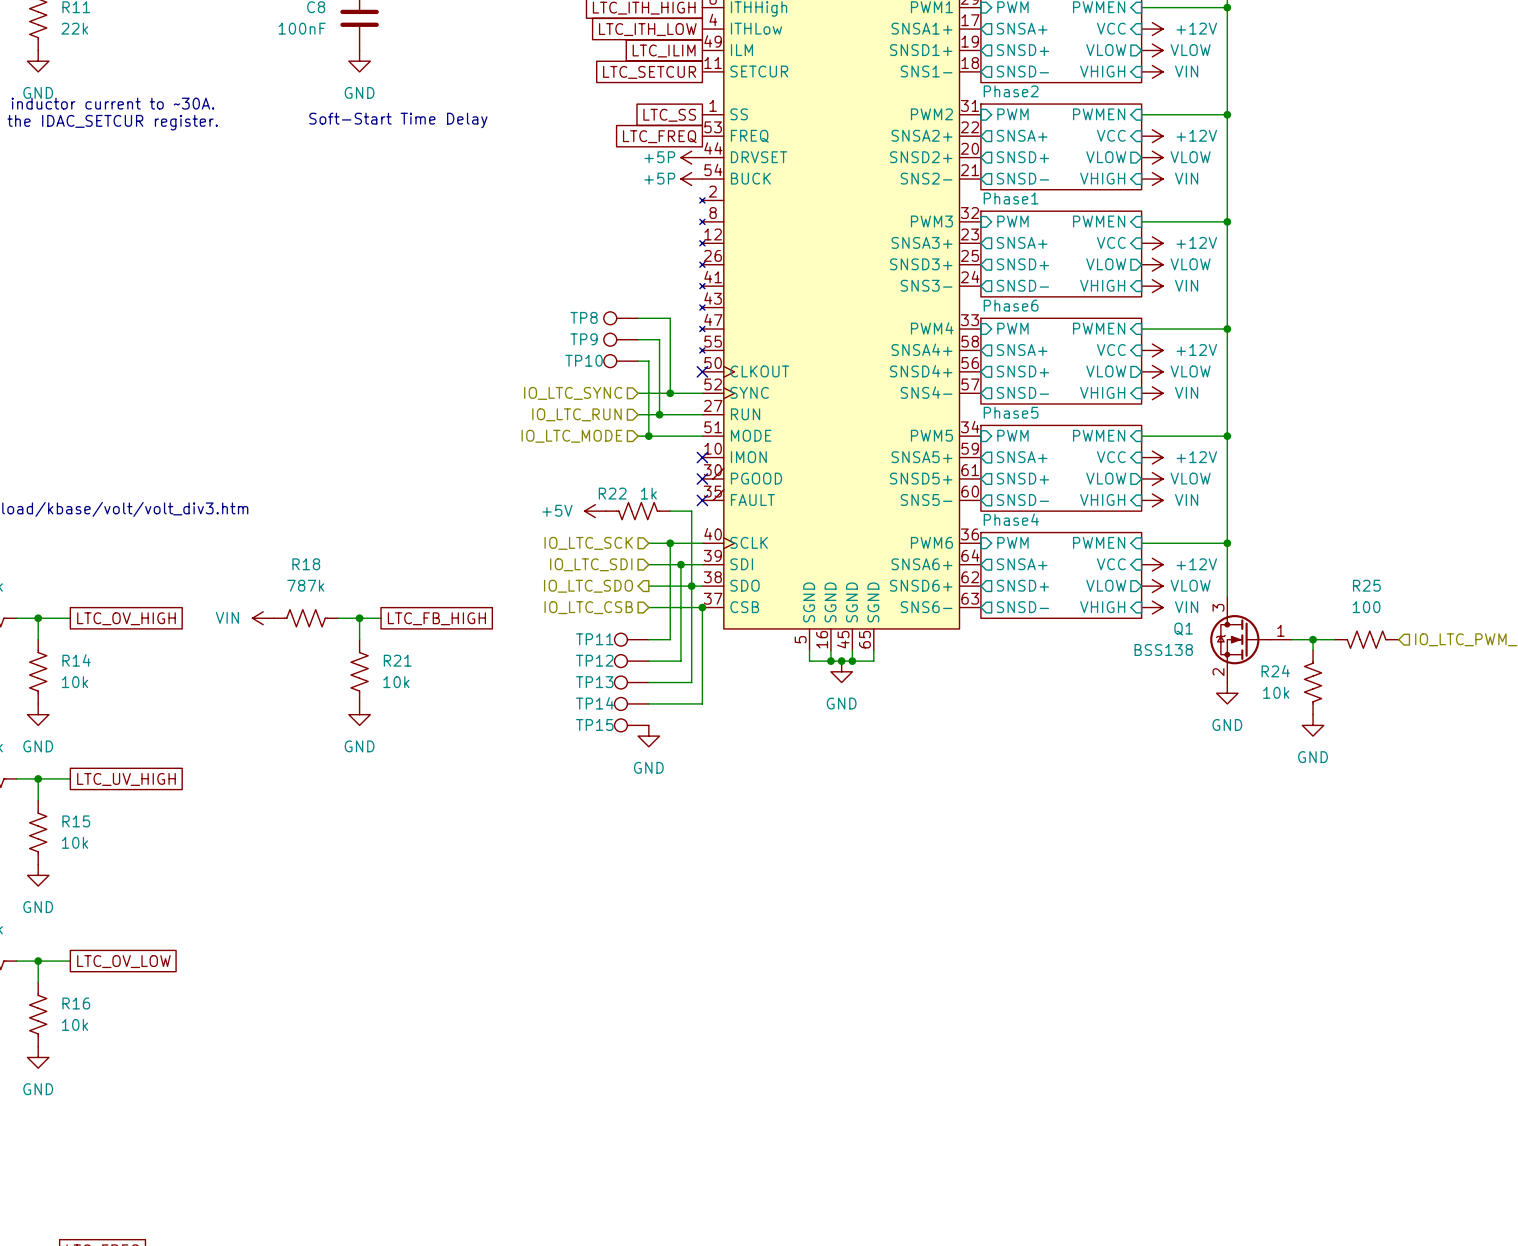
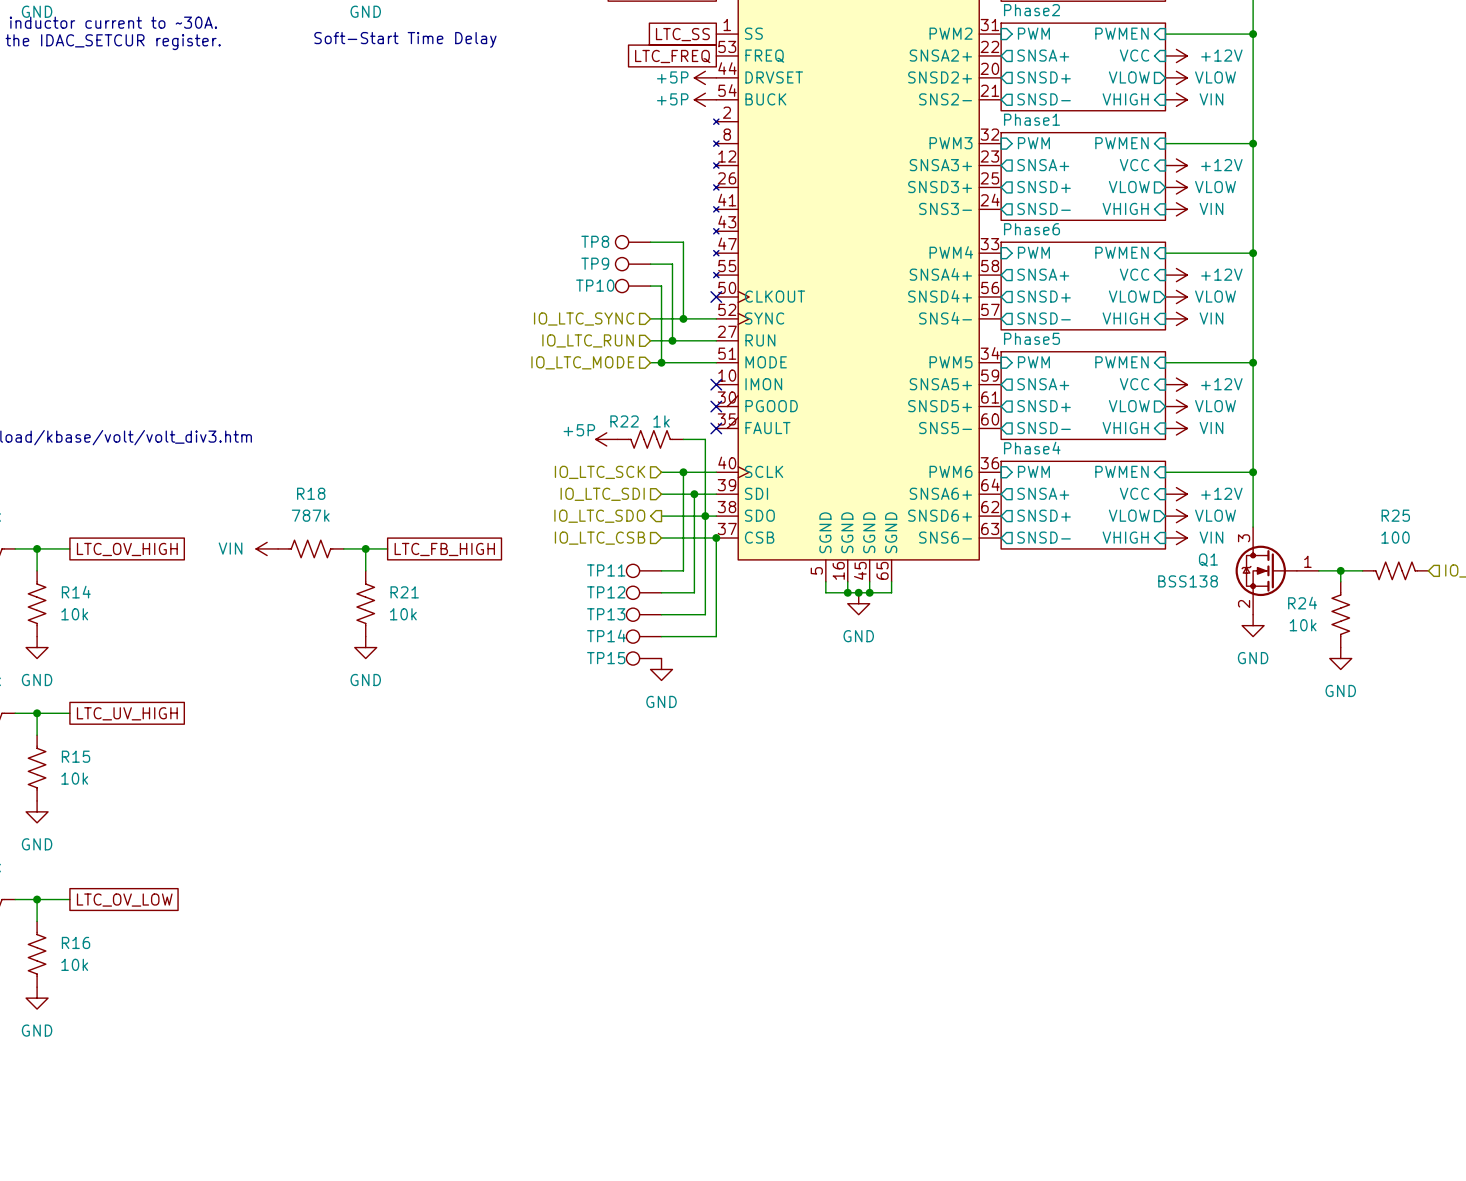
power symbol: +5V (595, 511) -> +5P (606, 439)

